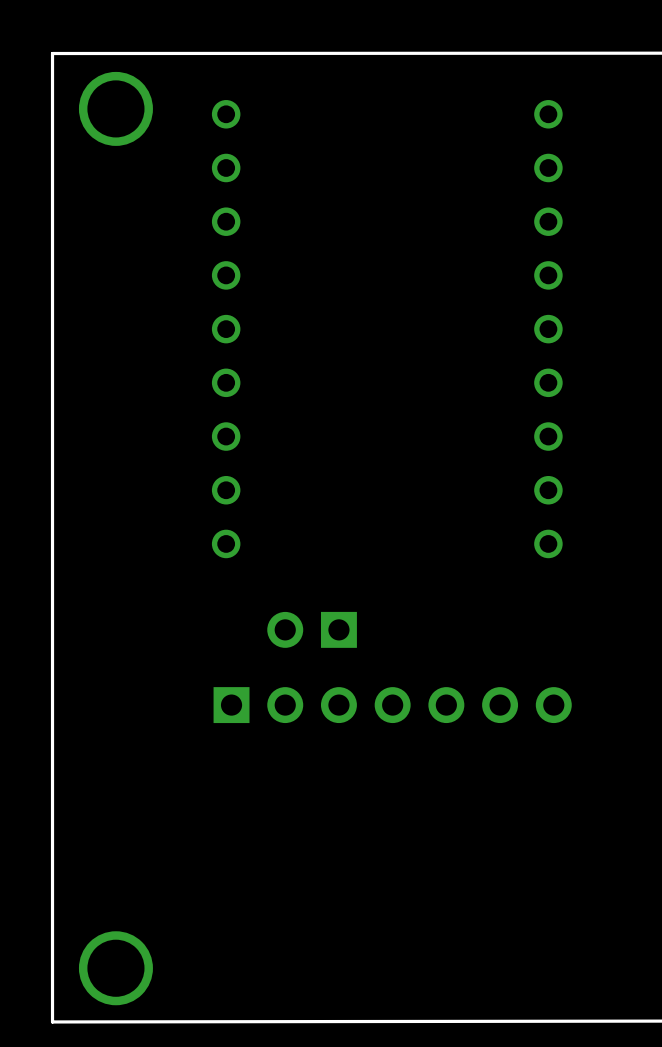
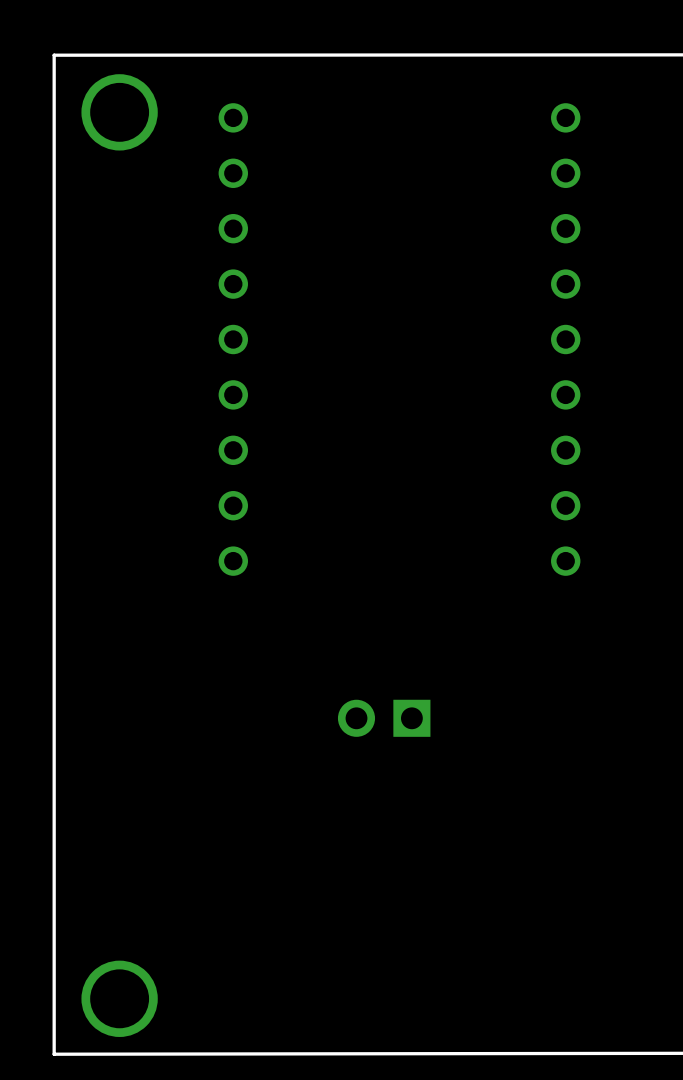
part position: (312, 629) -> (384, 718)
part: (392, 705) -> none

